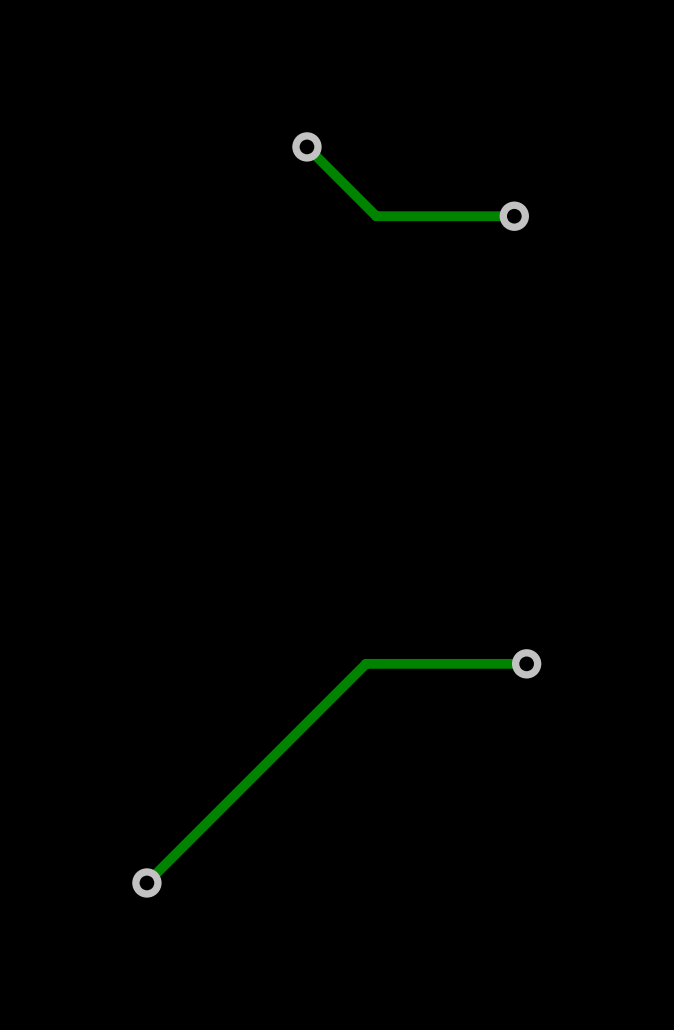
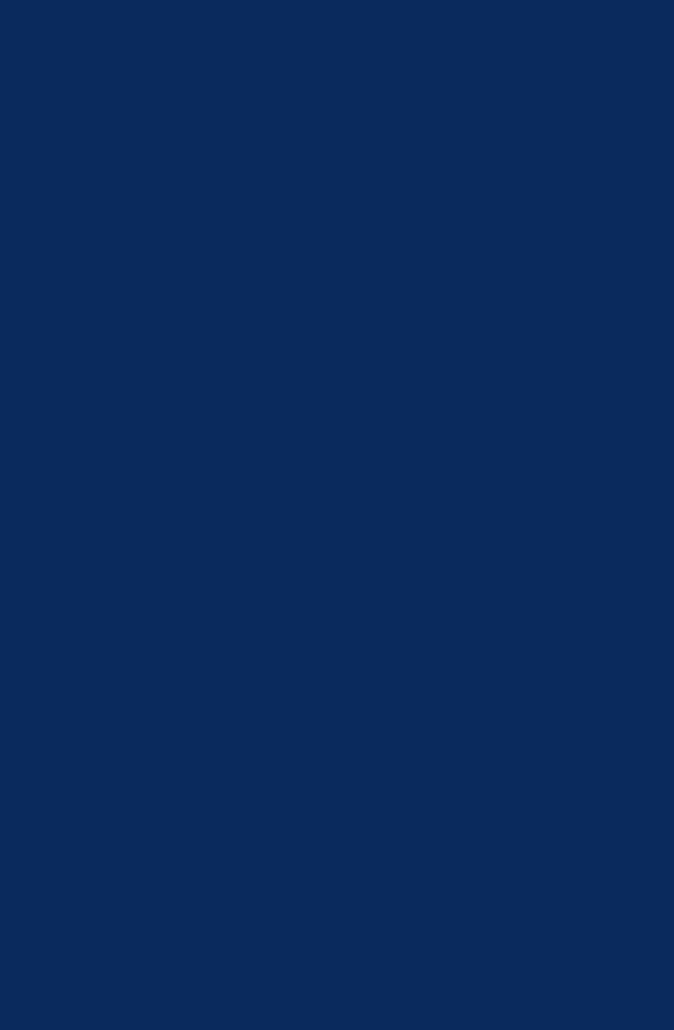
track: (306, 146) (376, 216) (514, 216) -> none
via: (306, 146) -> none
via: (514, 216) -> none
track: (526, 663) (366, 663) (146, 882) -> none
via: (526, 663) -> none
via: (146, 882) -> none

